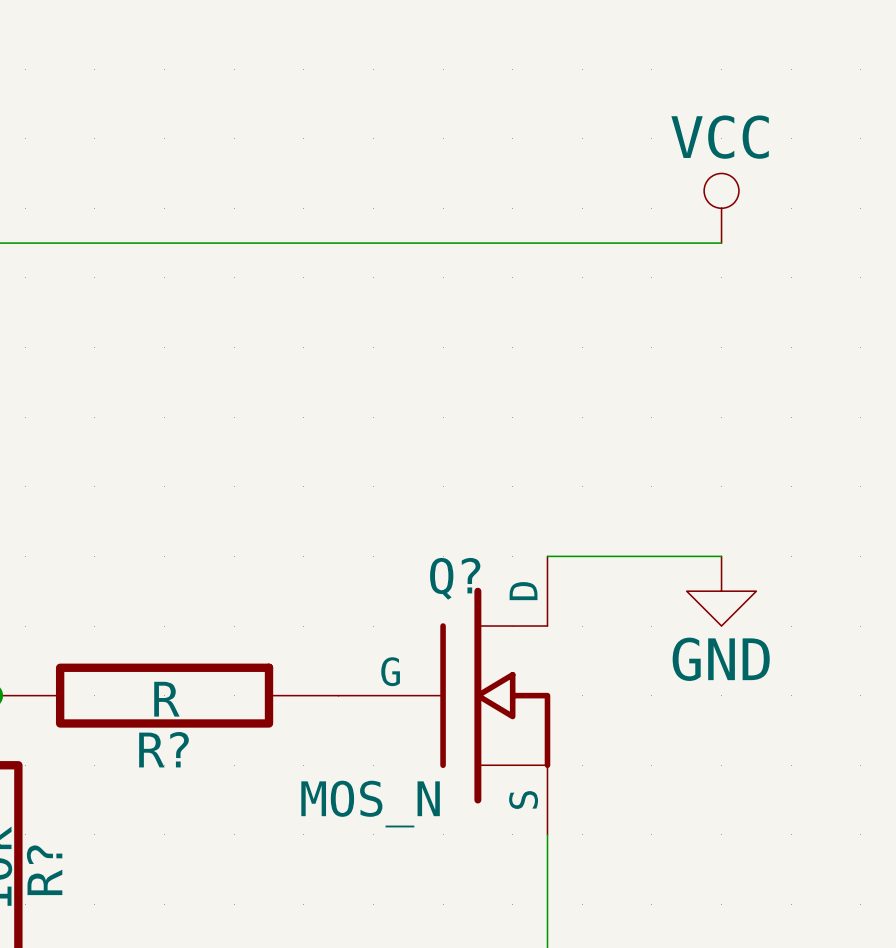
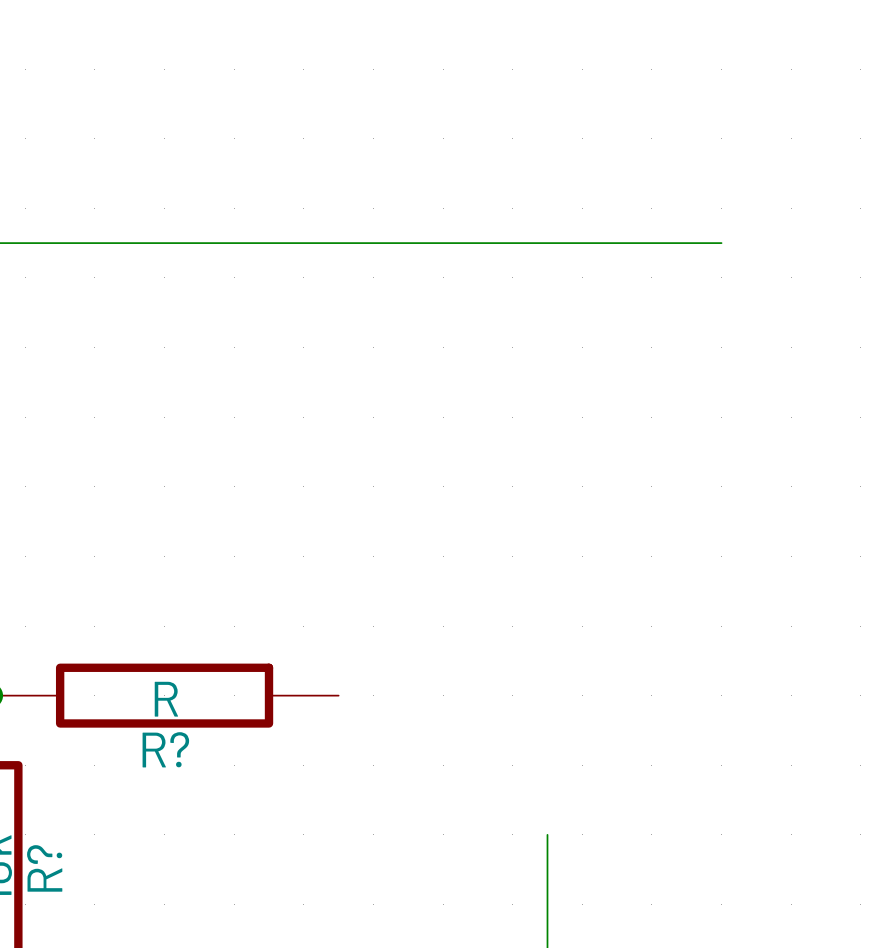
power symbol: VCC (721, 208) -> none
wire: (547, 556) (721, 556) -> none
power symbol: GND (721, 591) -> none
Q?: MOS_N (444, 695) -> none

